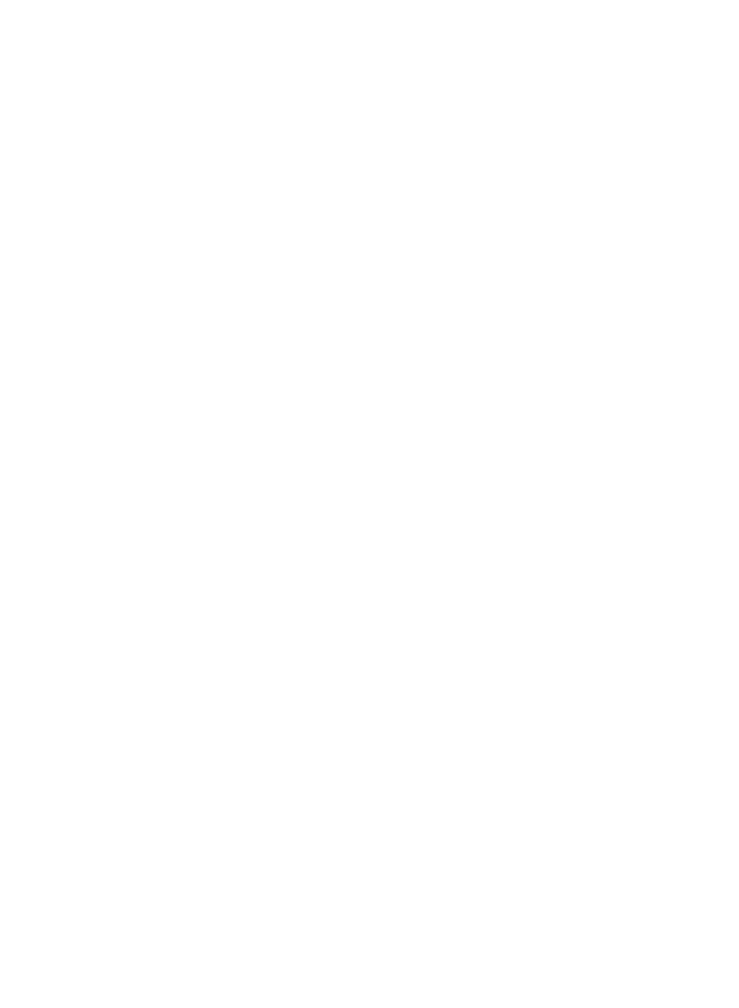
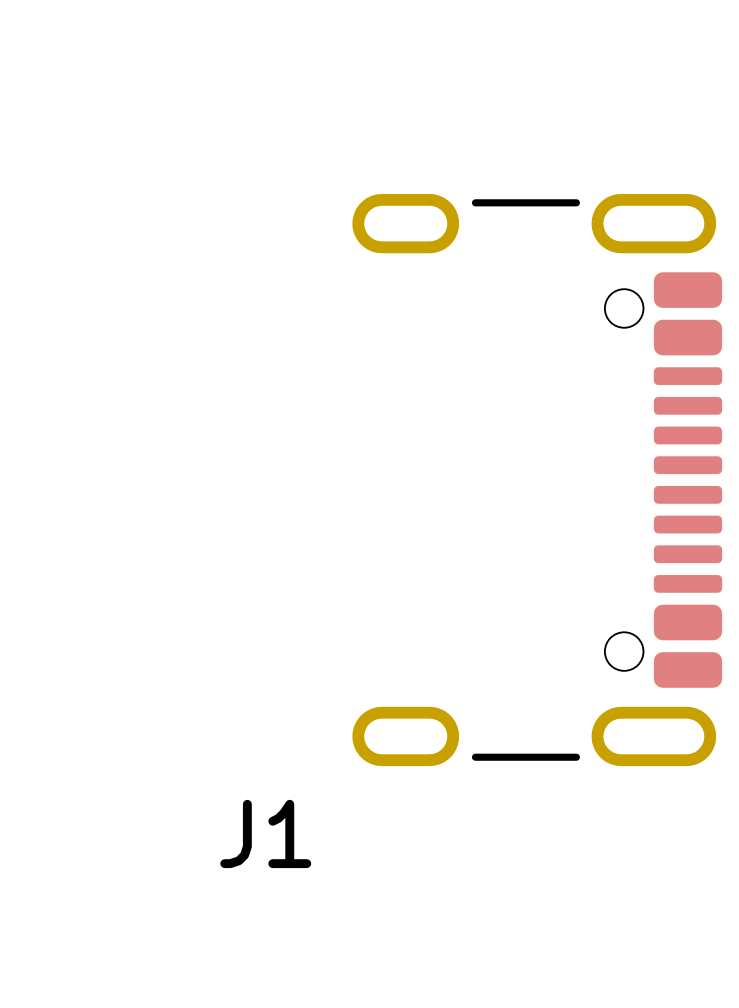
J1: none -> (537, 480)

